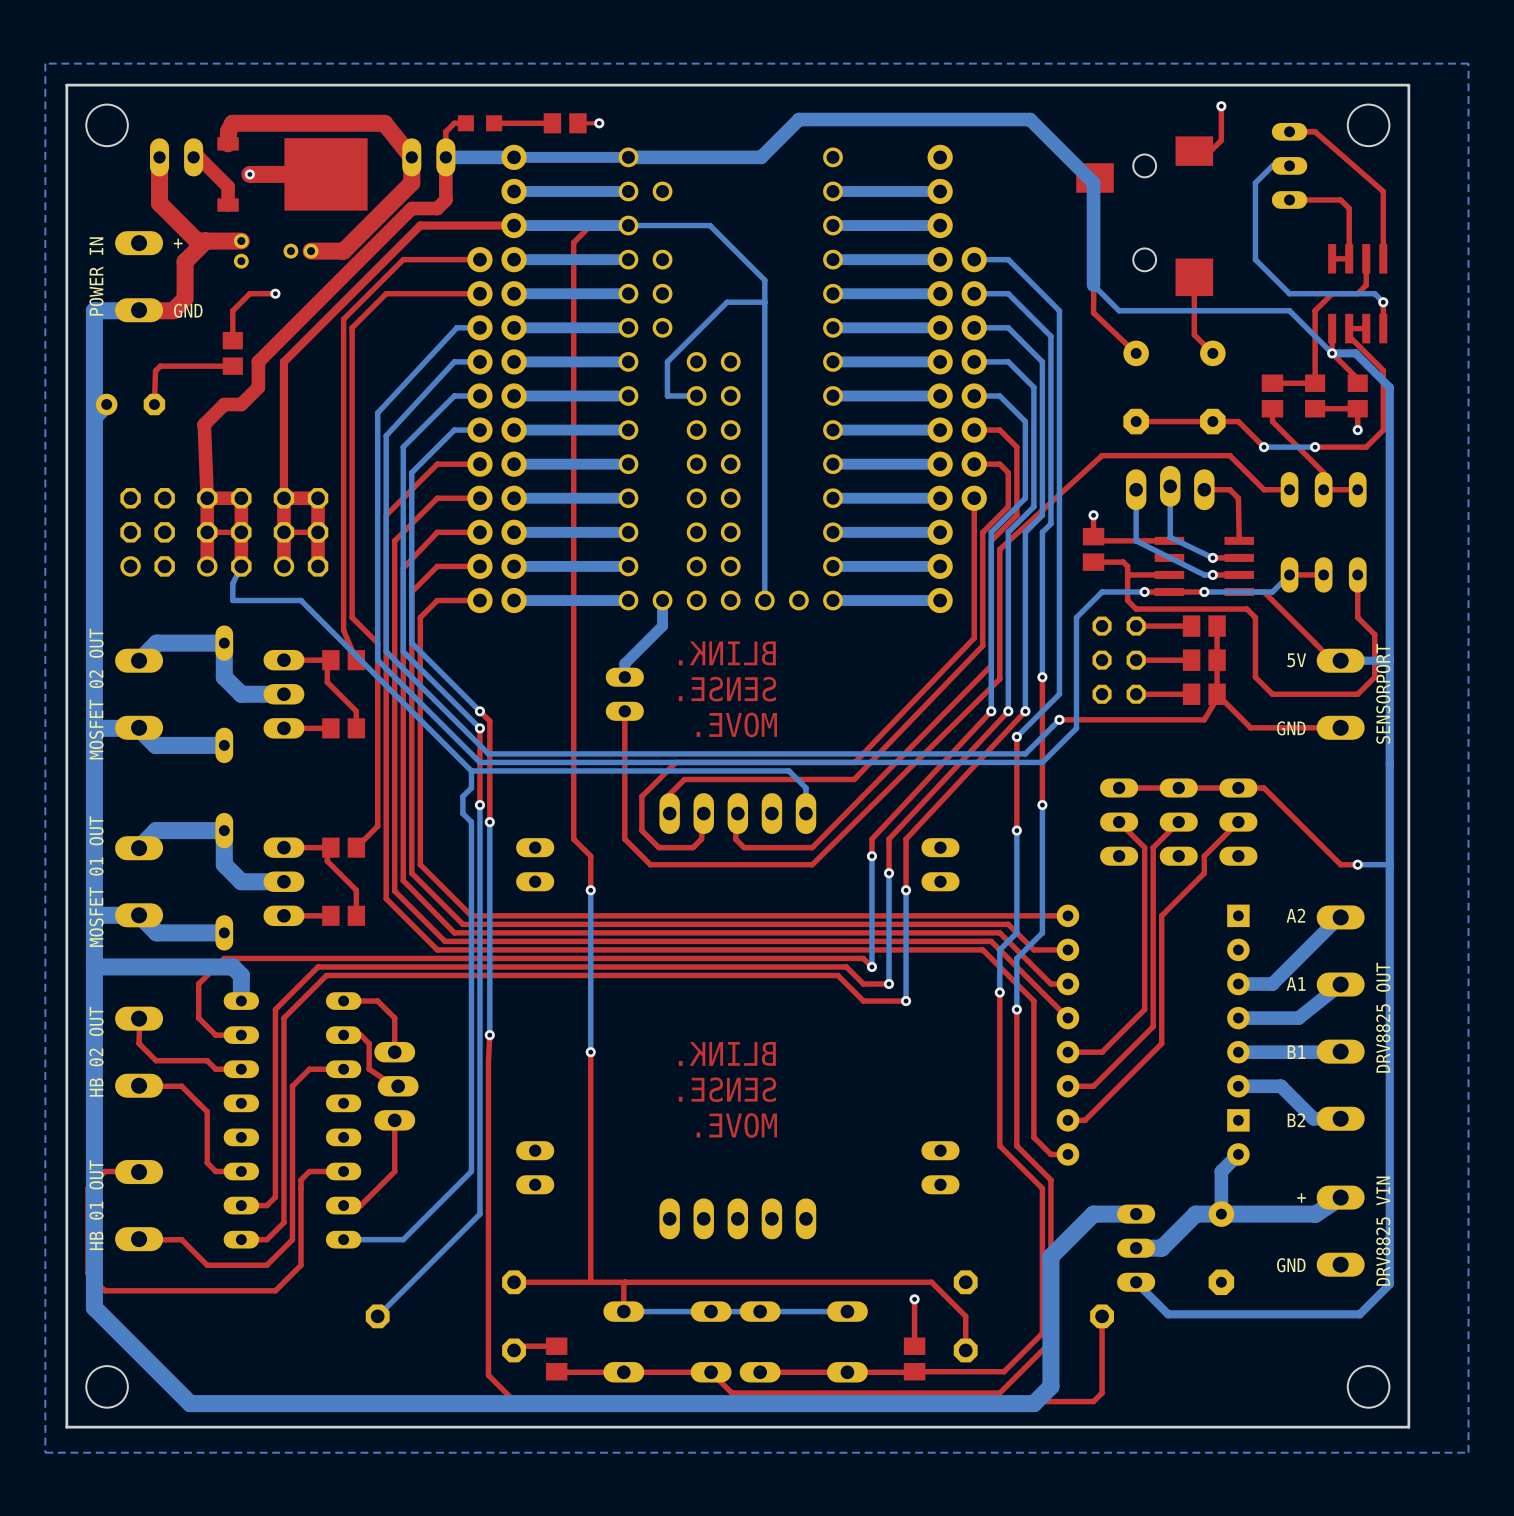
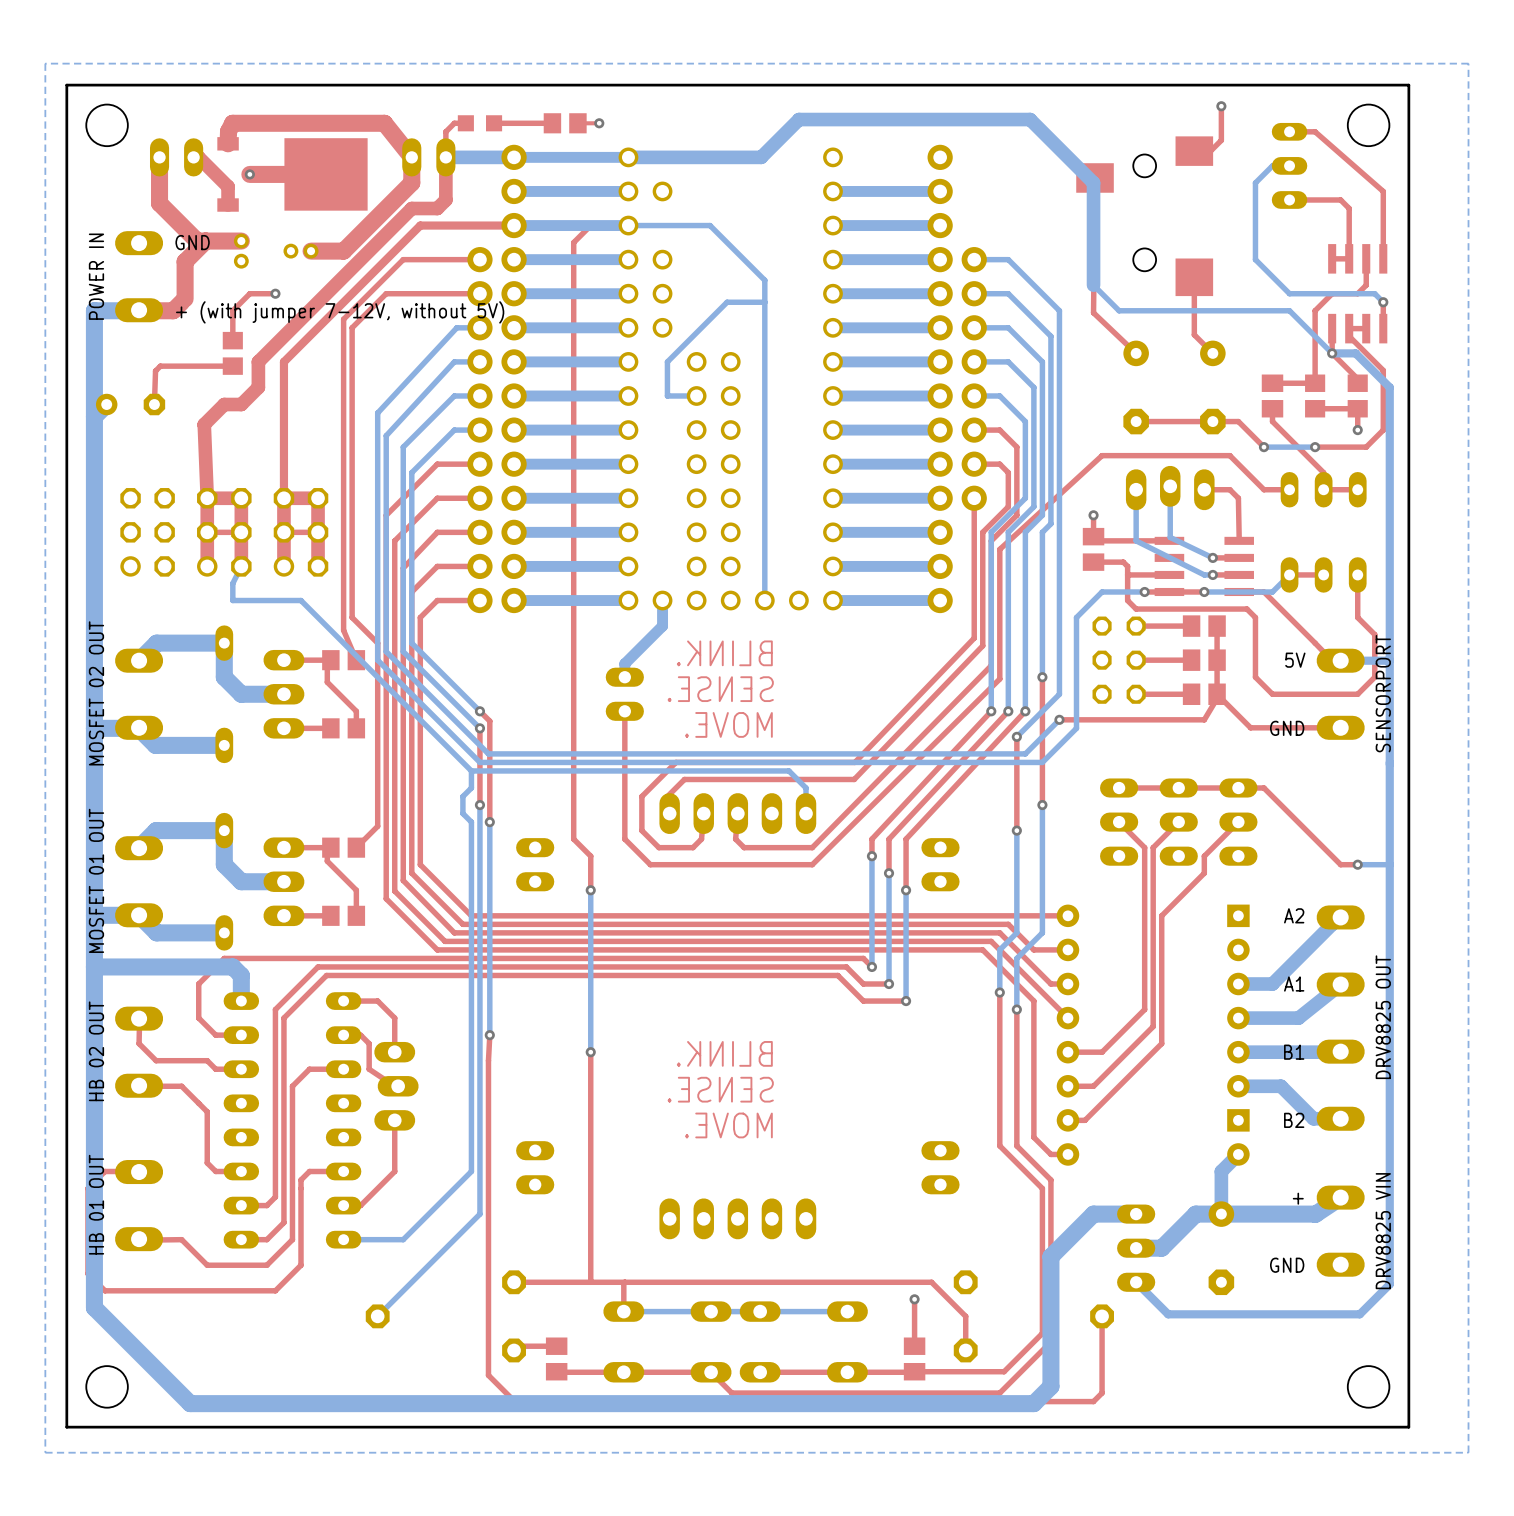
text: + (178, 243) -> GND (192, 242)
text: GND (188, 310) -> + (with jumper 7-12V, without 5V) (340, 312)

